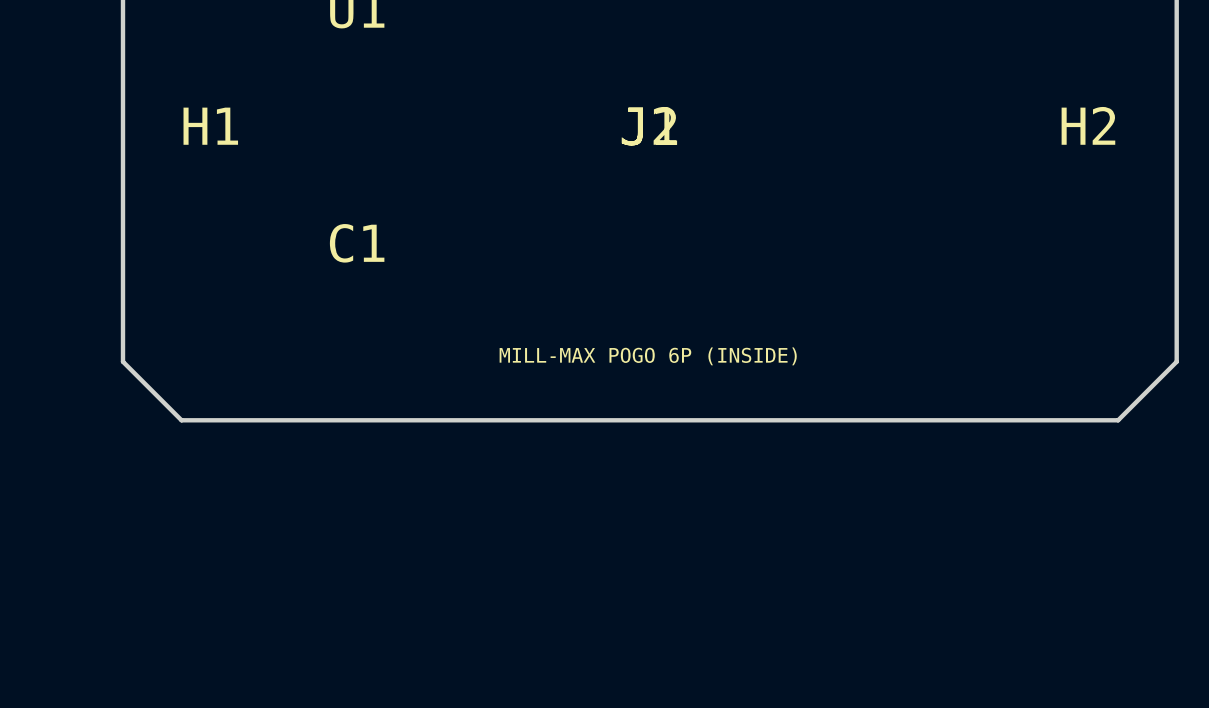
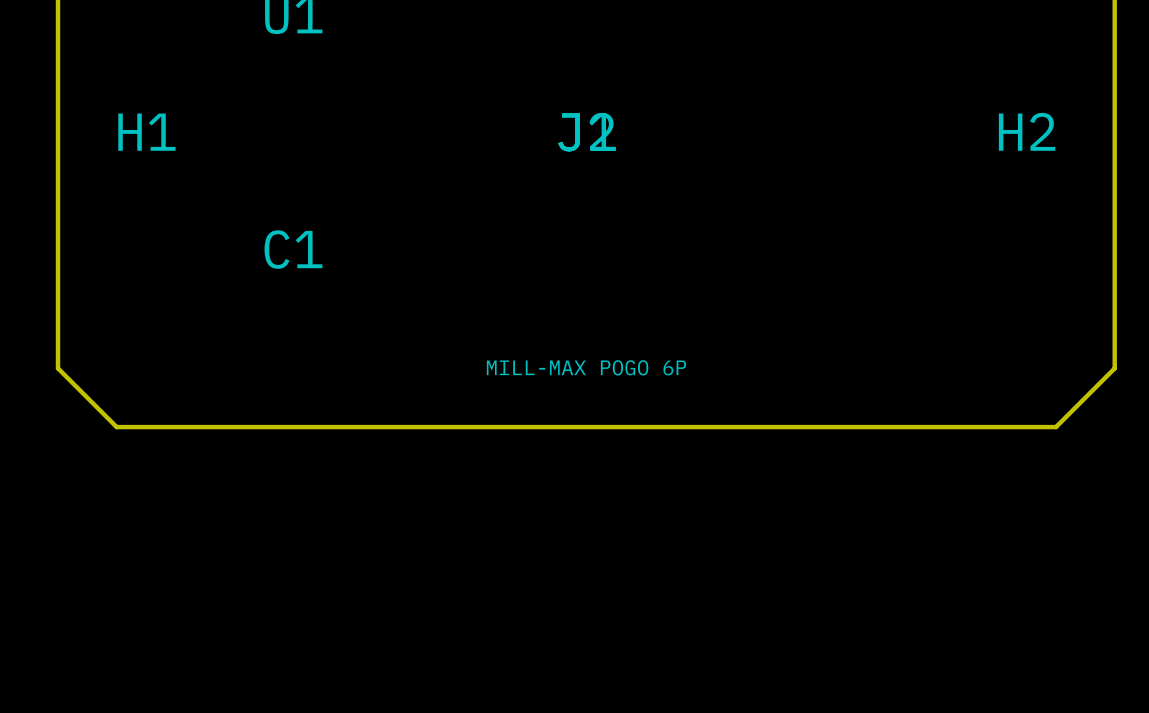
text: MILL-MAX POGO 6P (INSIDE) (648, 356) -> MILL-MAX POGO 6P (586, 367)

